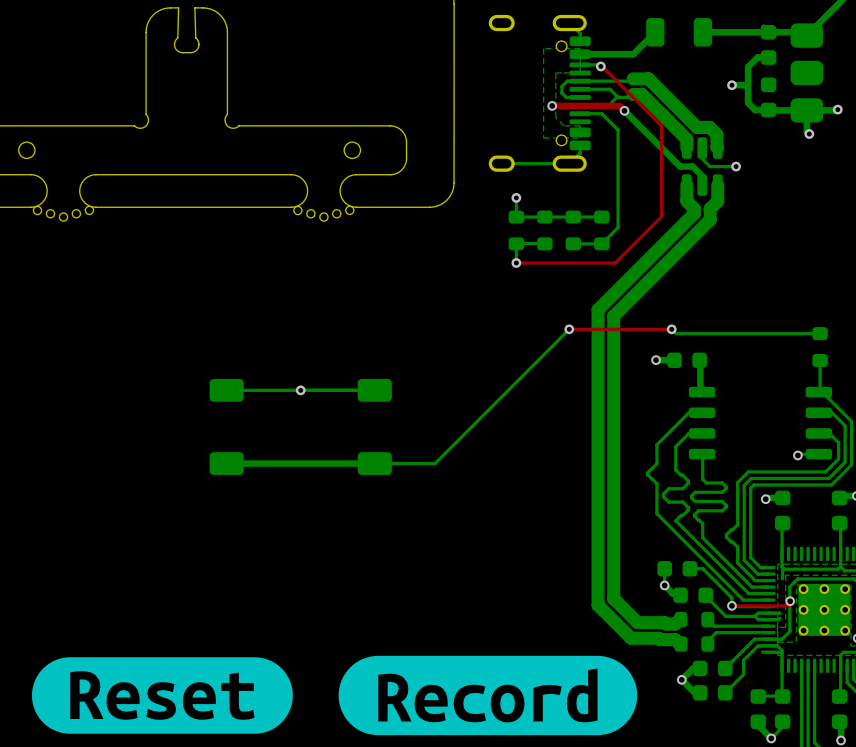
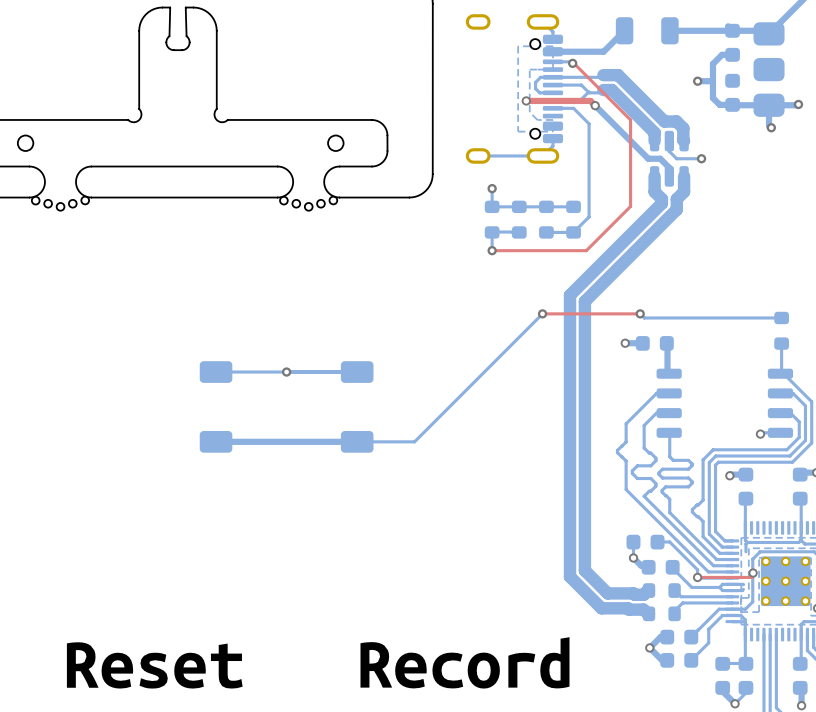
drawing shape: [338, 655, 638, 736] -> [360, 637, 570, 689]
drawing shape: [31, 657, 293, 734] -> [66, 642, 243, 689]

